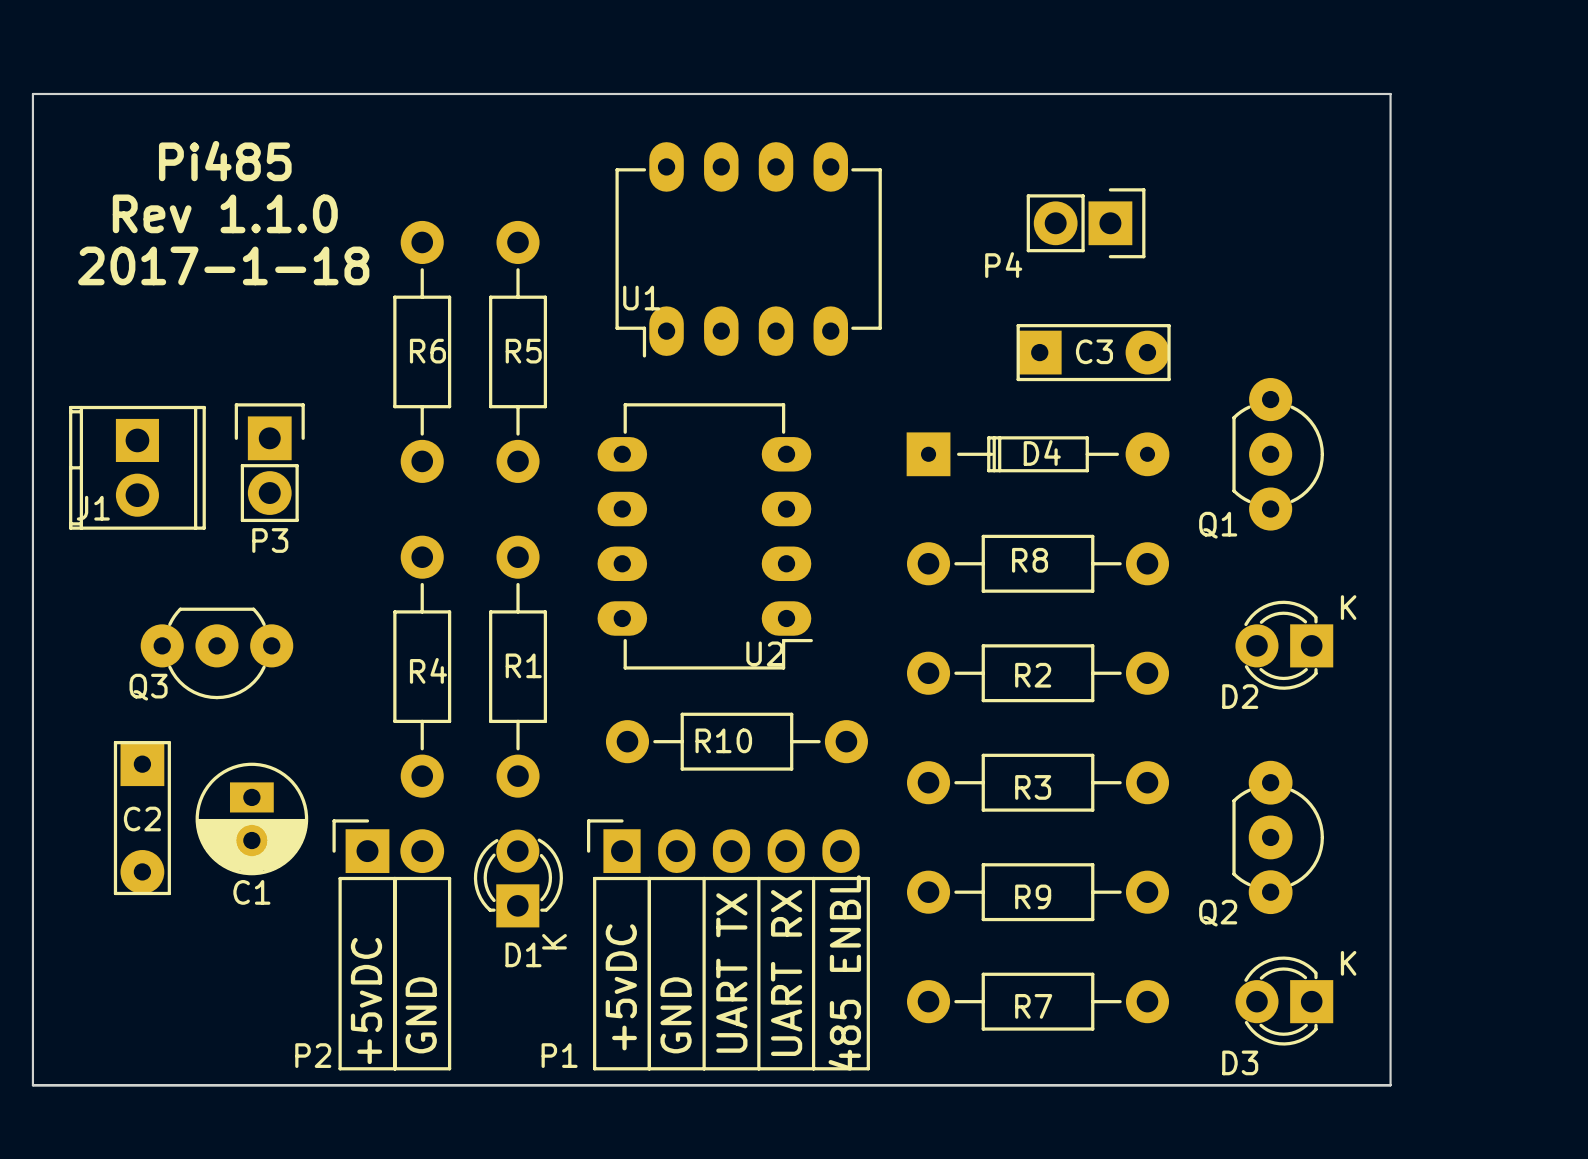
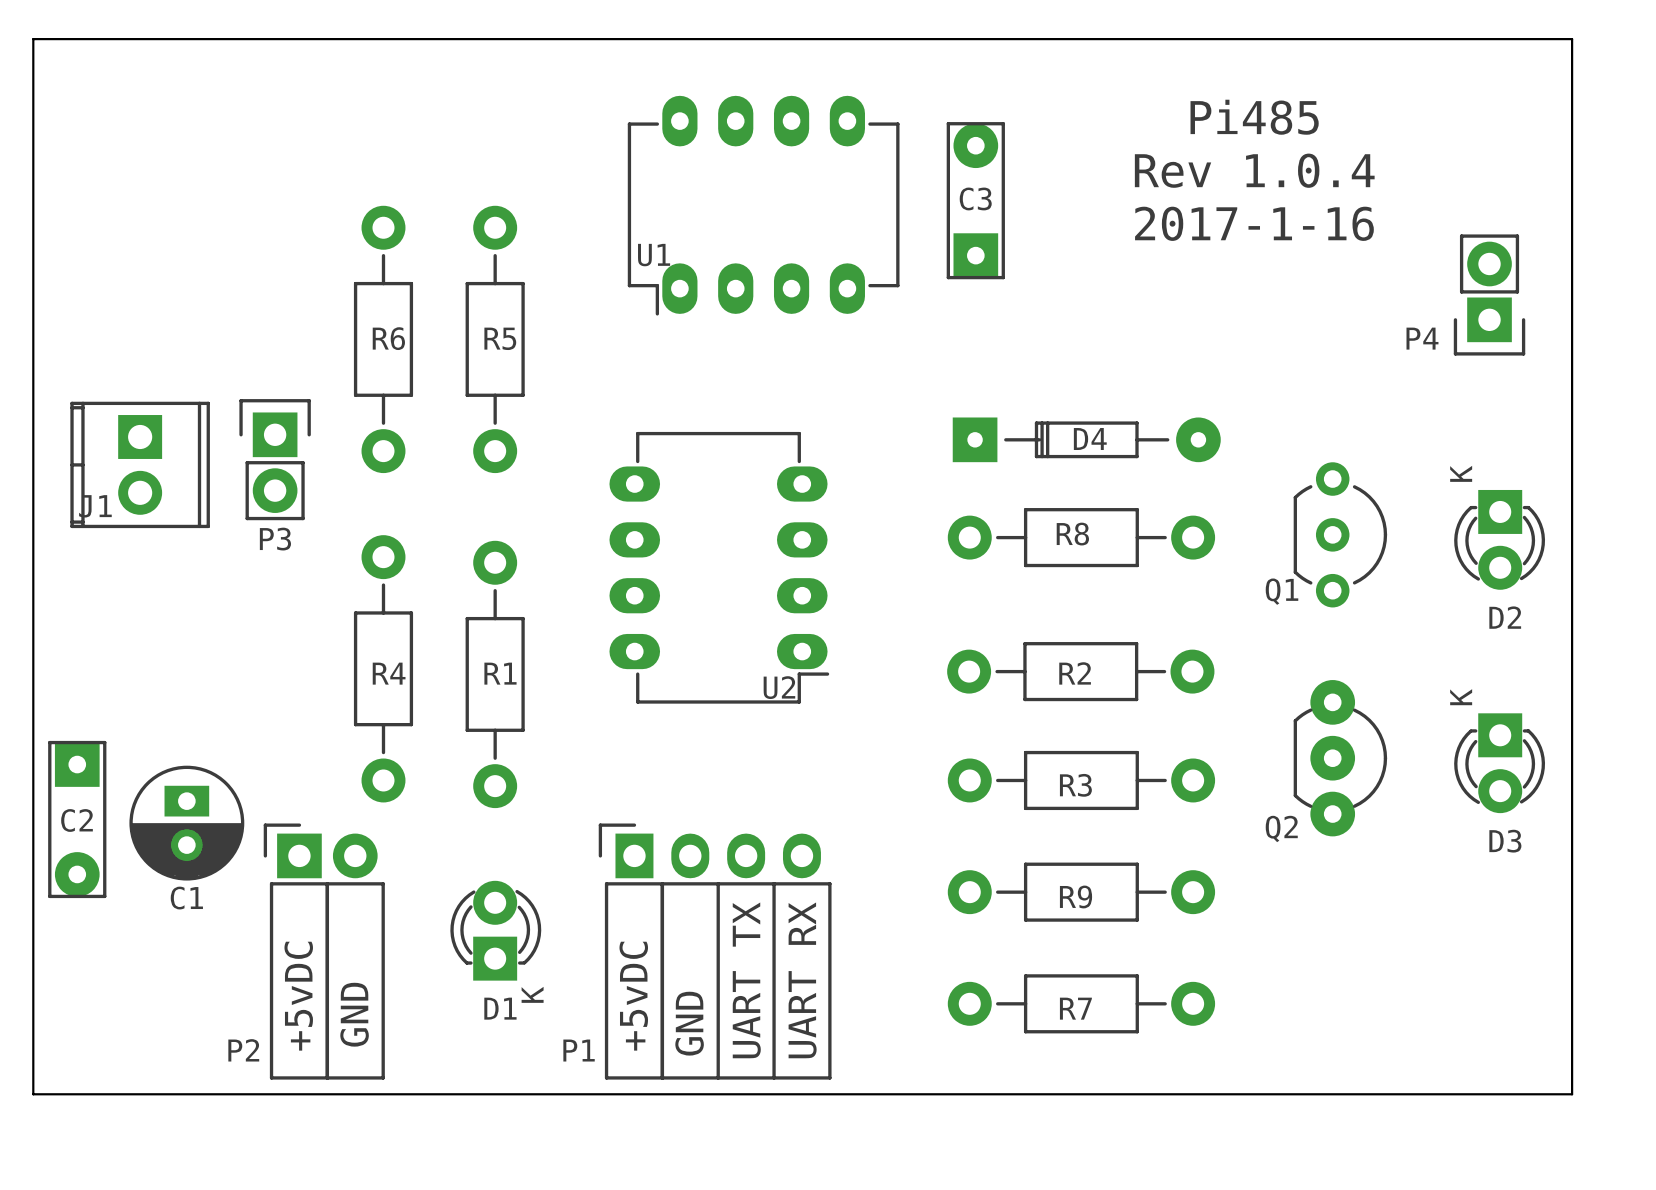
board edge: (32, 93) (1390, 93) (1390, 1085) (32, 1085) (32, 93) -> (33, 39) (33, 1094) (1572, 1094) (1572, 39) (33, 39)
text: none -> Pi485 (1254, 117)
text: Pi485 (225, 161) -> none
text: none -> Rev 1.0.4 (1254, 170)
text: Rev 1.1.0 (225, 213) -> none
P4 rotation: 0° (1086, 223) -> 90° clockwise (1489, 294)
P4 position: (1086, 223) -> (1489, 294)
text: none -> 2017-1-16 (1254, 223)
U1 position: (748, 249) -> (763, 205)
text: 2017-1-18 (223, 265) -> none
R6 position: (422, 351) -> (383, 339)
R5 position: (518, 351) -> (495, 339)
C3 rotation: 0° (1093, 352) -> 90° counterclockwise (975, 200)
C3 position: (1093, 352) -> (975, 200)
Q1 footprint: [1232, 378, 1324, 531] -> [1293, 462, 1388, 608]
D4 position: (1038, 454) -> (1086, 439)
U2 position: (705, 536) -> (719, 567)
R8 position: (1038, 563) -> (1081, 537)
D2 rotation: 0° (1284, 645) -> 90° counterclockwise (1499, 539)
D2 position: (1284, 645) -> (1499, 539)
Q3: (216, 653) -> none
R4 position: (422, 666) -> (383, 668)
R1 position: (518, 666) -> (495, 674)
R2 position: (1038, 673) -> (1080, 671)
D2 name position: D2 (1240, 696) -> D2 (1505, 617)
R10: (736, 741) -> none
R3 position: (1038, 782) -> (1081, 780)
C2 position: (142, 818) -> (77, 819)
C1 position: (251, 818) -> (186, 823)
P1 footprint: [587, 819, 870, 1071] -> [598, 823, 832, 1080]
Q2 position: (1278, 837) -> (1340, 758)
D1 position: (518, 878) -> (495, 930)
R9 position: (1038, 892) -> (1081, 892)
Q2 name position: Q2 (1218, 913) -> Q2 (1281, 828)
P2 position: (391, 944) -> (324, 951)
text: 485 ENBL (844, 973) -> none
text position: +5vDC (366, 1001) -> +5vDC (298, 996)
R7 position: (1038, 1001) -> (1081, 1003)
D3 rotation: 0° (1284, 1001) -> 90° counterclockwise (1499, 763)
D3 position: (1284, 1001) -> (1499, 763)
text position: GND (421, 1015) -> GND (354, 1014)
P2 name position: P2 (313, 1055) -> P2 (243, 1050)
D3 name position: D3 (1240, 1062) -> D3 (1505, 841)

